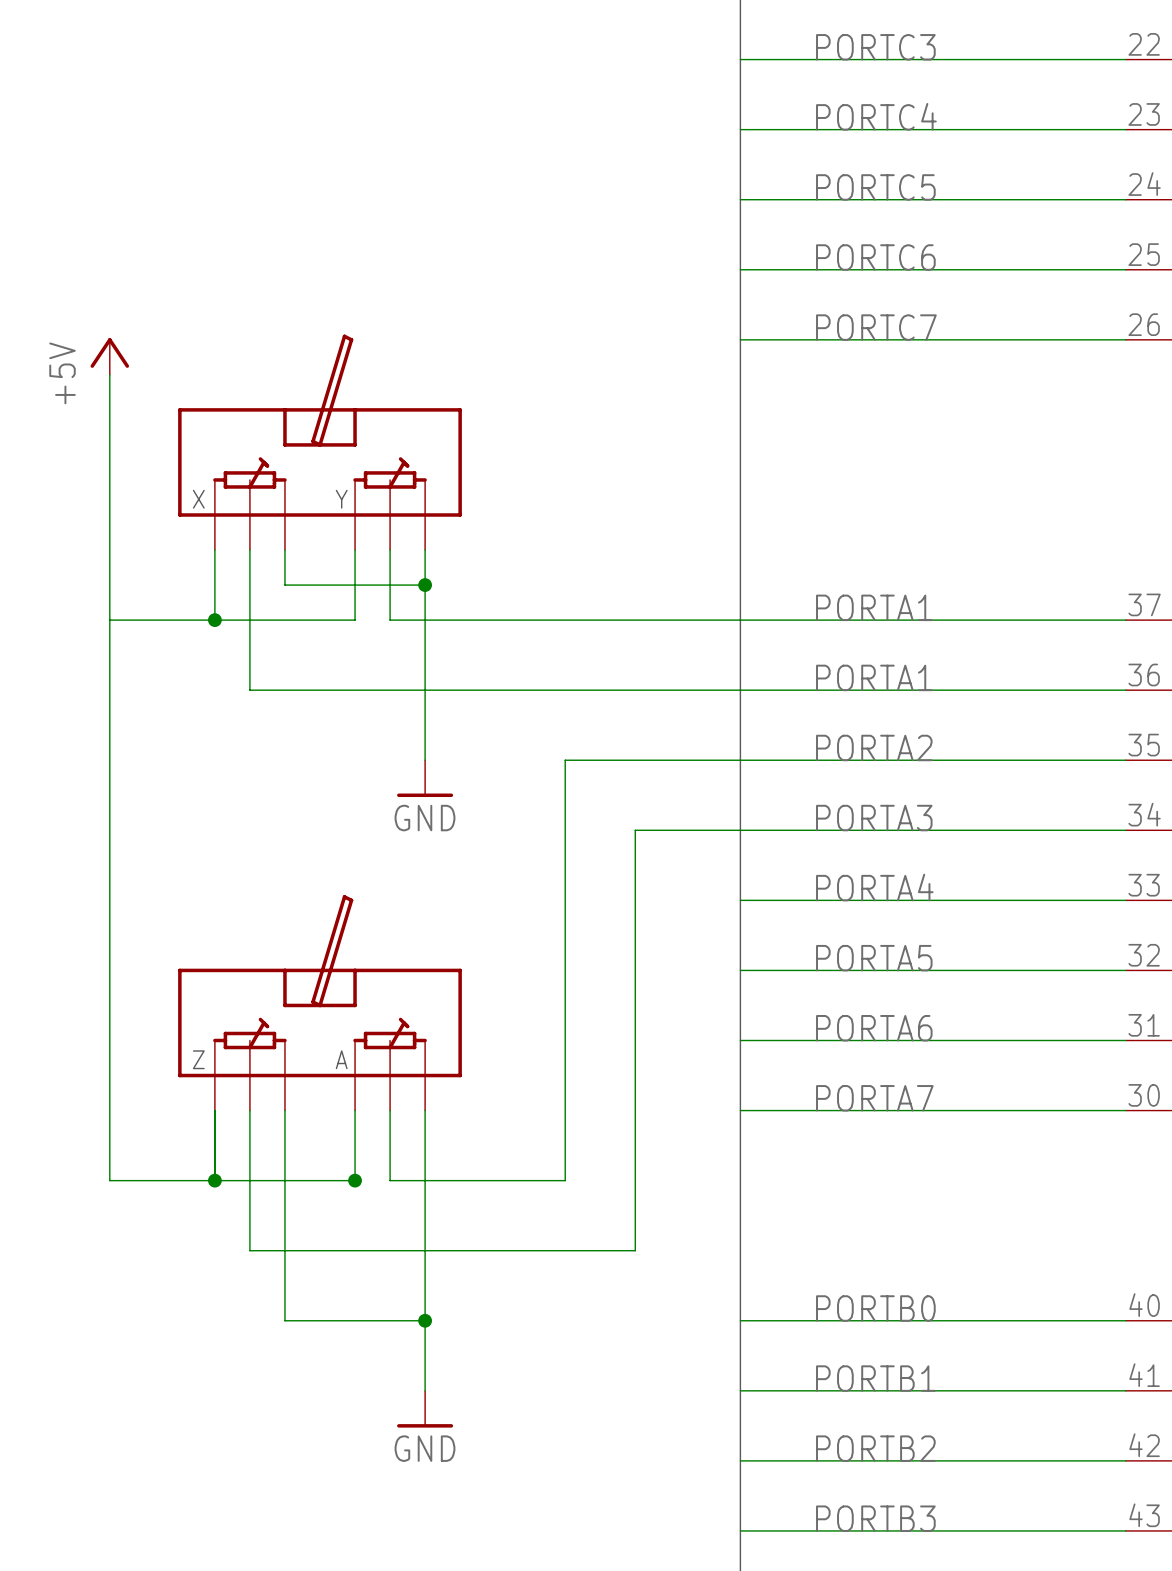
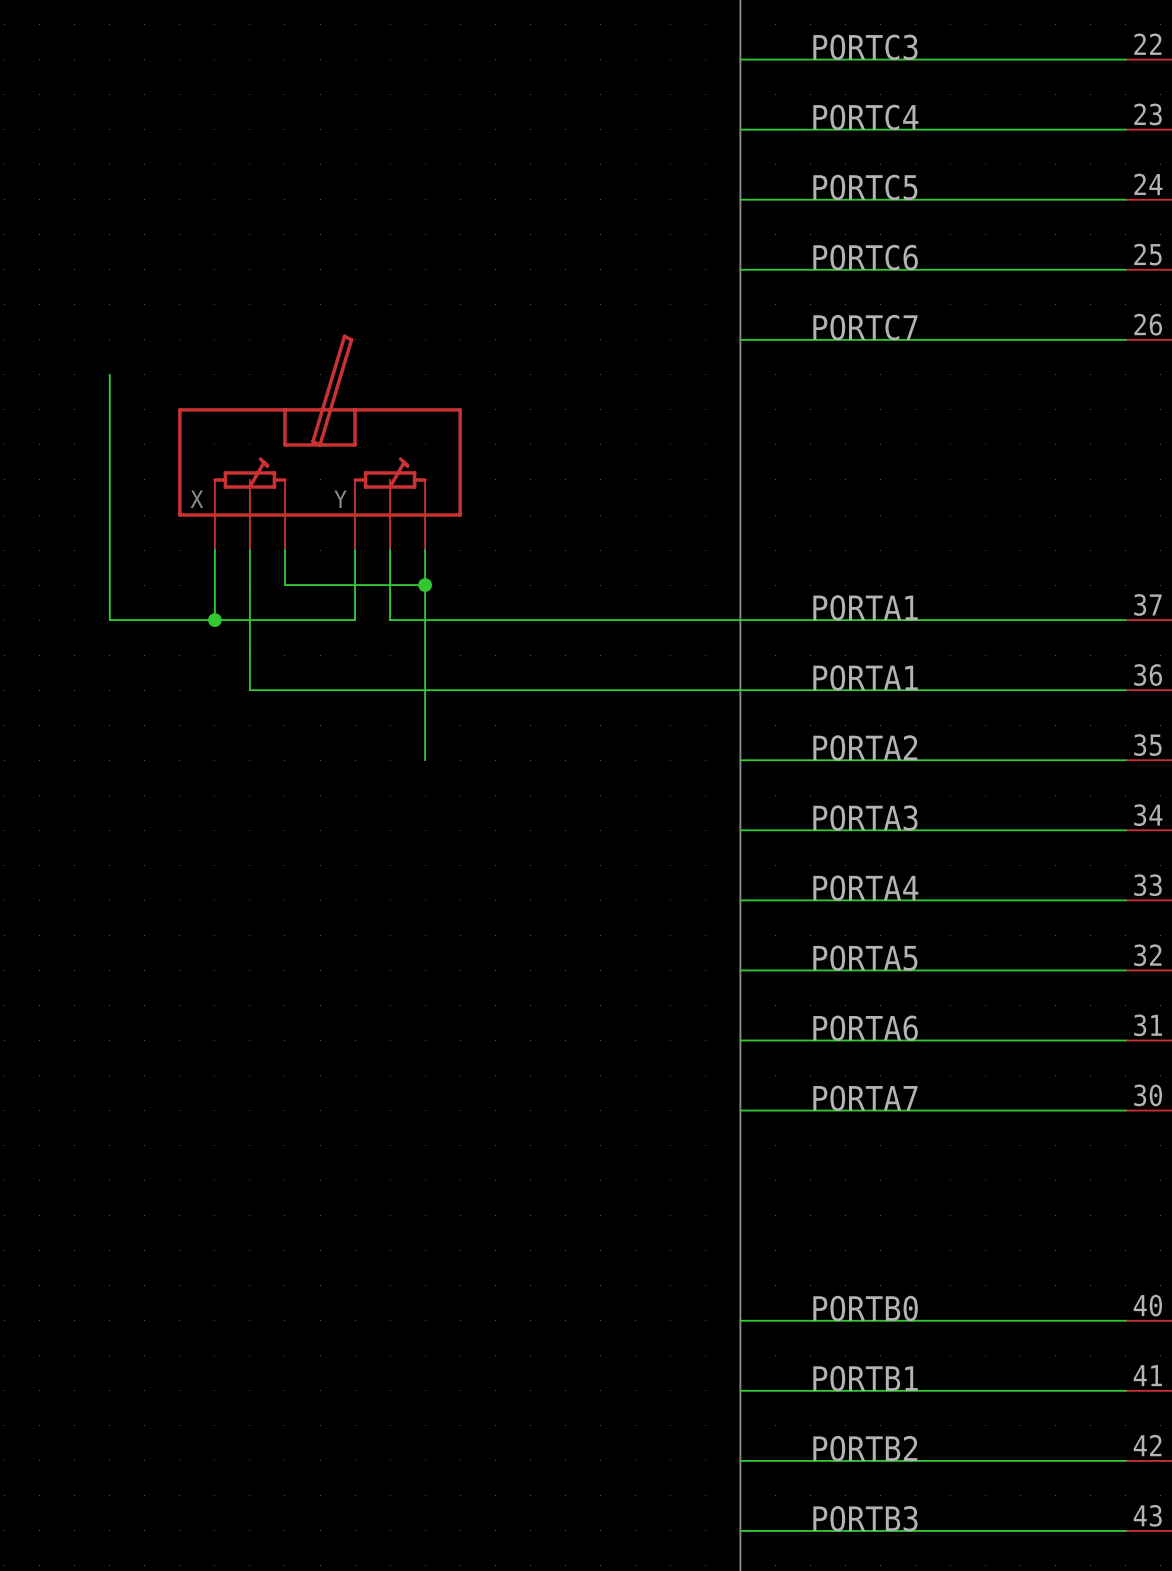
power symbol: +5V (109, 356) -> none
wire: (109, 620) (109, 1180) (355, 1180) (355, 1110) -> none
wire: (740, 760) (565, 760) (565, 1180) (390, 1180) (390, 1110) -> none
power symbol: GND (425, 778) -> none
wire: (740, 830) (635, 830) (635, 1250) (249, 1250) (249, 1110) -> none
part: (320, 1002) -> none
wire: (214, 1110) (214, 1180) -> none
wire: (284, 1110) (284, 1320) (425, 1320) -> none
wire: (425, 1110) (425, 1390) -> none
junction: (214, 1180) -> none
junction: (355, 1180) -> none
junction: (425, 1320) -> none
power symbol: GND (425, 1409) -> none

